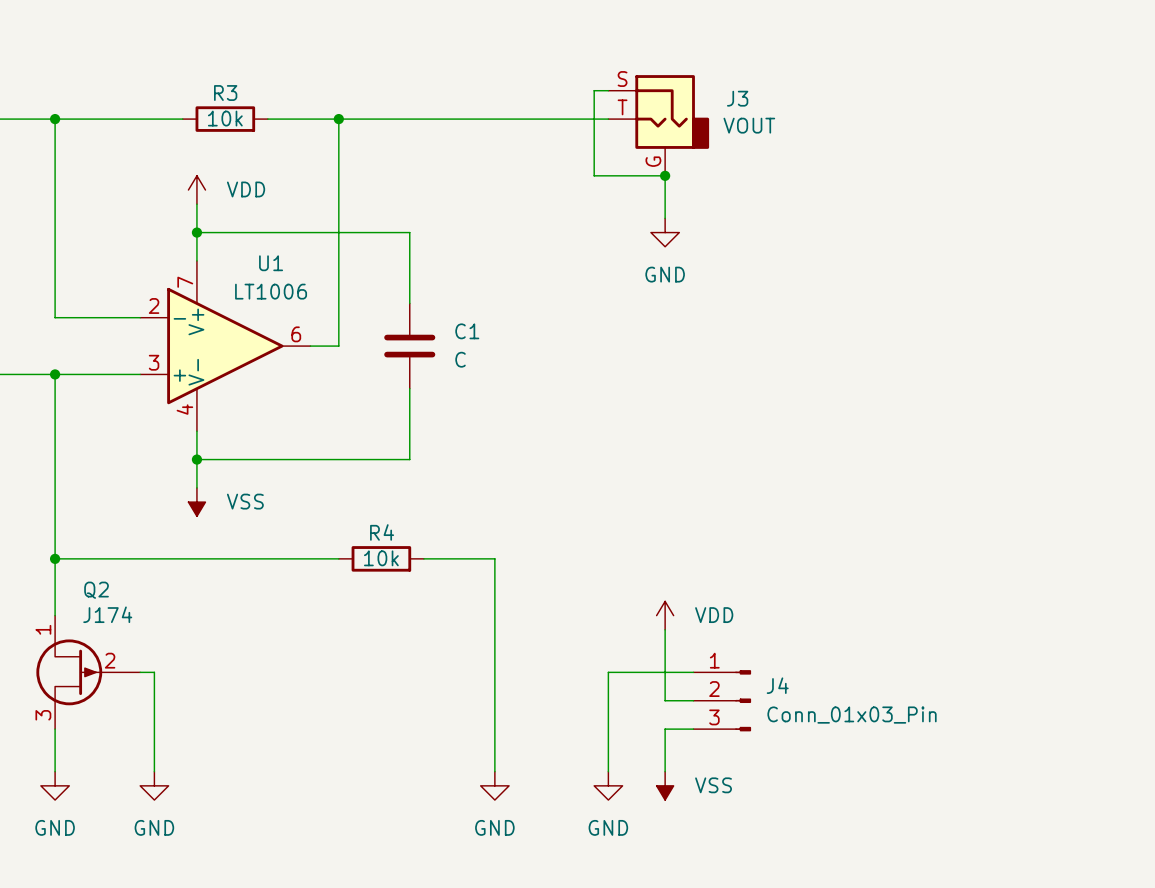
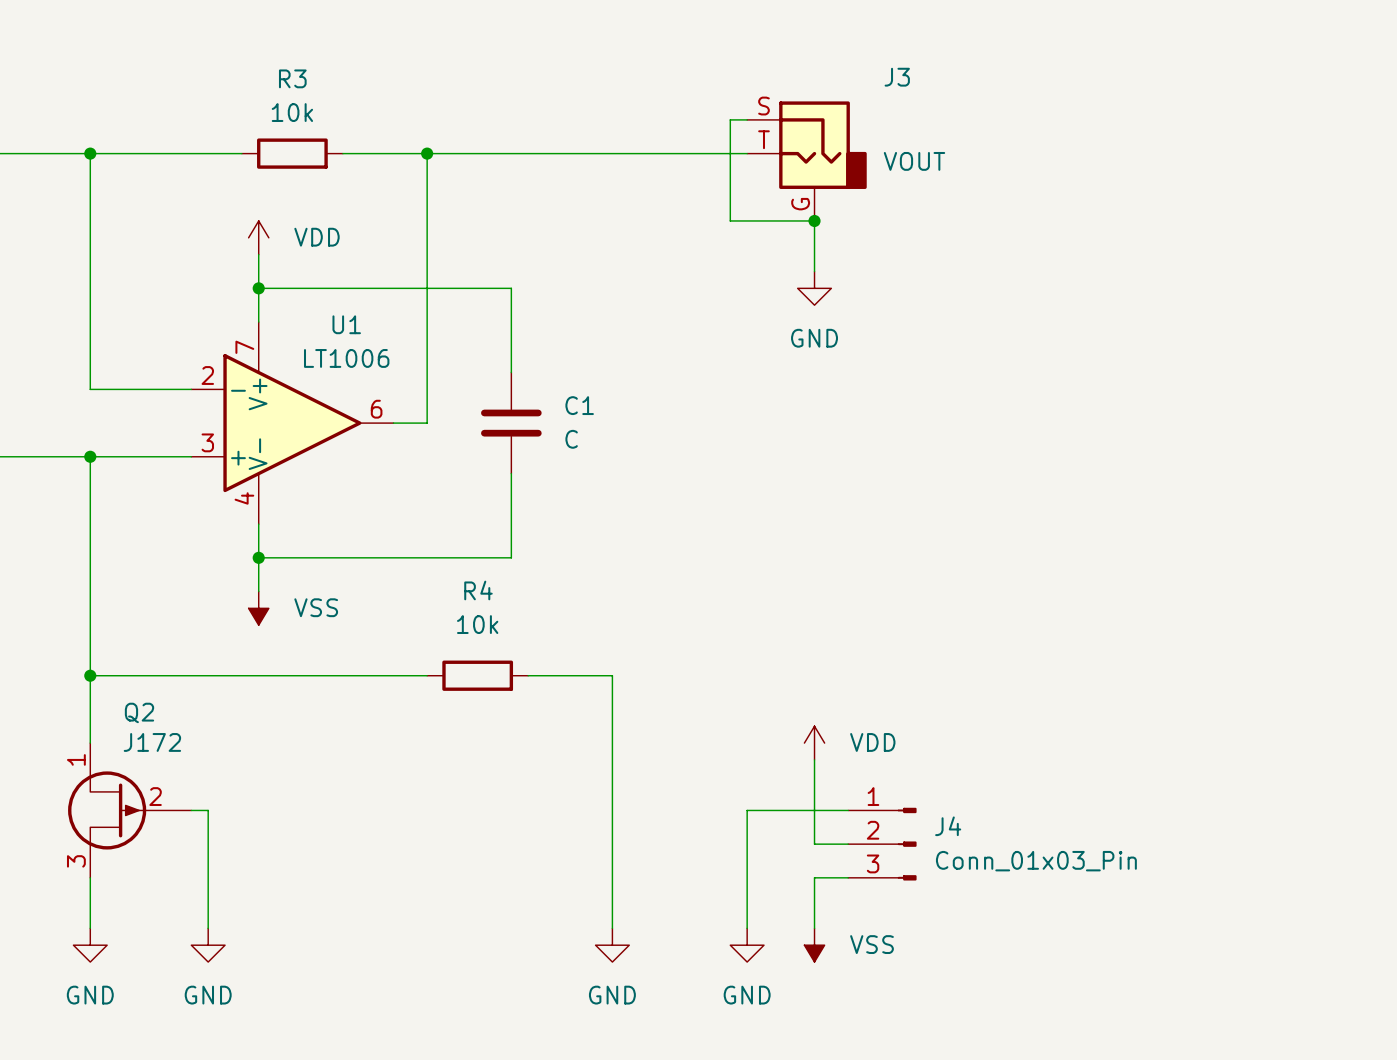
R3 name position: R3 (225, 93) -> R3 (292, 78)
J3 name position: J3 (737, 98) -> J3 (897, 77)
R3 value position: 10k (225, 118) -> 10k (292, 112)
R4 name position: R4 (382, 532) -> R4 (478, 590)
R4 value position: 10k (381, 558) -> 10k (477, 624)
Q2 value: J174 (107, 614) -> J172 (152, 742)

